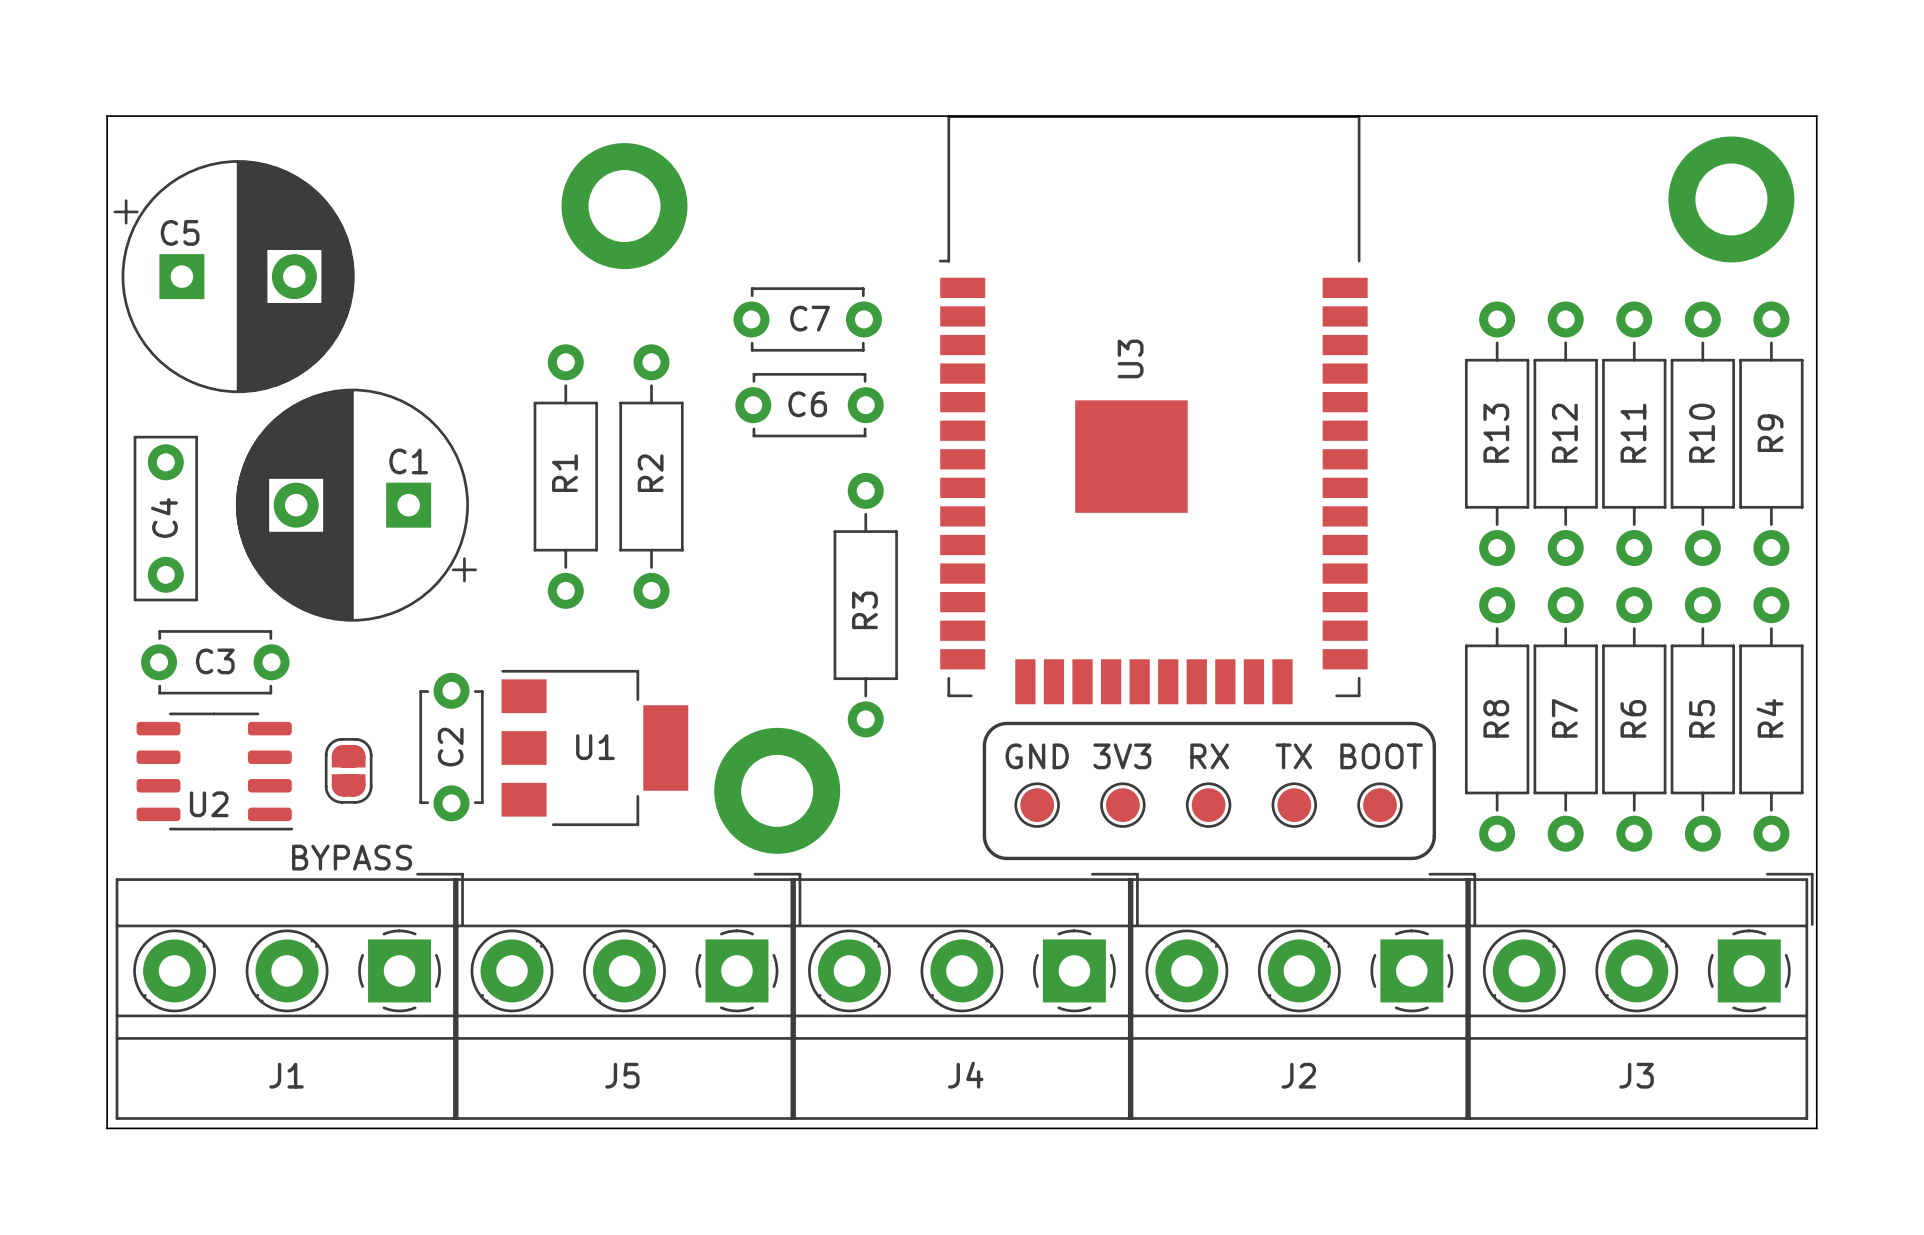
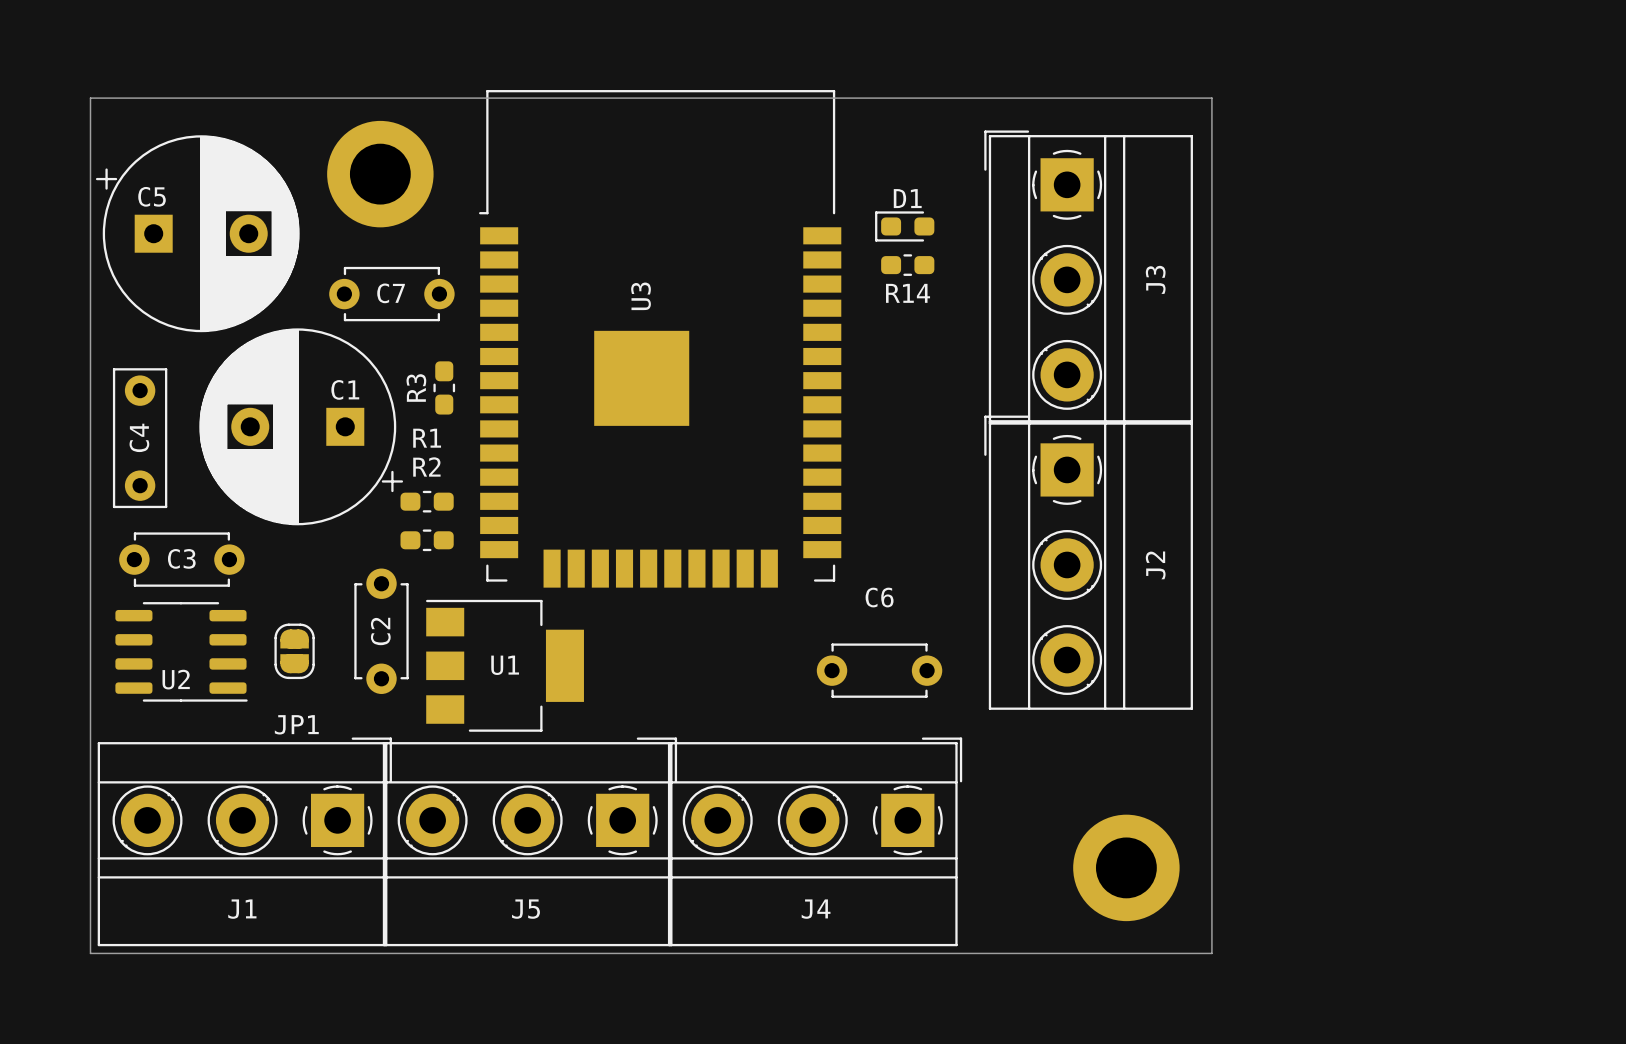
board edge: (1434, 116) (1816, 116) (1816, 1128) (1434, 1128) -> (1211, 98) (1211, 953)
part: (1731, 199) -> none
part position: (624, 206) -> (380, 174)
D1: none -> (904, 226)
R14: none -> (907, 265)
C7 name position: C7 (810, 318) -> C7 (391, 293)
C6 position: (807, 319) -> (879, 670)
R1 footprint: [533, 344, 598, 609] -> [400, 490, 454, 513]
R2 footprint: [619, 344, 684, 609] -> [400, 529, 454, 552]
C6 name position: C6 (807, 404) -> C6 (879, 597)
C7 position: (809, 405) -> (391, 294)
U3 position: (1153, 409) -> (660, 338)
R13: (1497, 433) -> none
R12: (1565, 433) -> none
R11: (1634, 433) -> none
R10: (1702, 433) -> none
R9: (1771, 433) -> none
R3 footprint: [833, 472, 898, 738] -> [433, 361, 456, 415]
R1 name position: R1 (564, 473) -> R1 (427, 438)
R2 name position: R2 (650, 473) -> R2 (426, 466)
R8: (1497, 719) -> none
R7: (1565, 719) -> none
R6: (1634, 719) -> none
R5: (1702, 719) -> none
R4: (1771, 719) -> none
line: (1006, 723) (1417, 724) (1427, 730) (1434, 743) (1433, 841) (1425, 853) (1411, 858) (1001, 857) (991, 851) (984, 838) (984, 745) (986, 737) (991, 730) (998, 725) (1006, 723) -> none
U1 position: (594, 747) -> (504, 665)
part: (777, 790) -> none
GND: (1037, 805) -> none
3V3: (1122, 805) -> none
RX: (1208, 805) -> none
TX: (1294, 805) -> none
BOOT: (1380, 805) -> none
BYPASS name: BYPASS (352, 857) -> JP1 (296, 724)
J2 rotation: 0° (1302, 996) -> 90° counterclockwise (1088, 562)
J2 position: (1302, 996) -> (1088, 562)
J3 rotation: 0° (1639, 996) -> 90° counterclockwise (1088, 277)
J3 position: (1639, 996) -> (1088, 277)
part: none -> (1126, 867)

